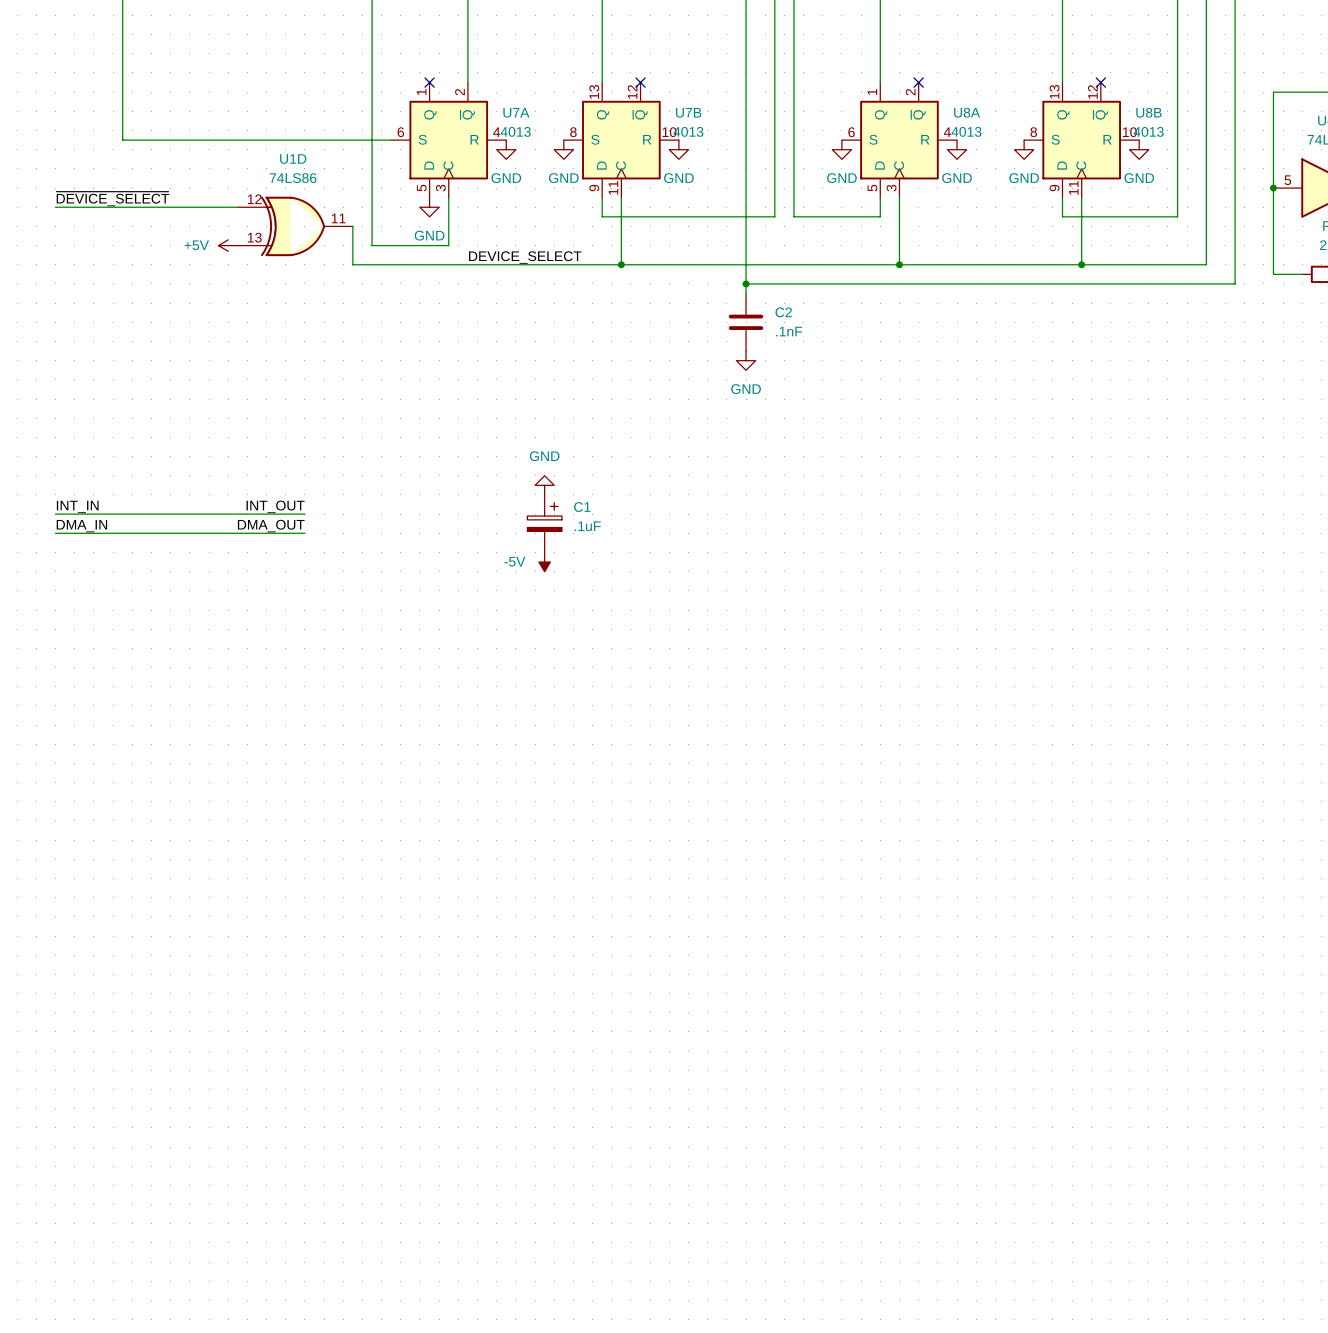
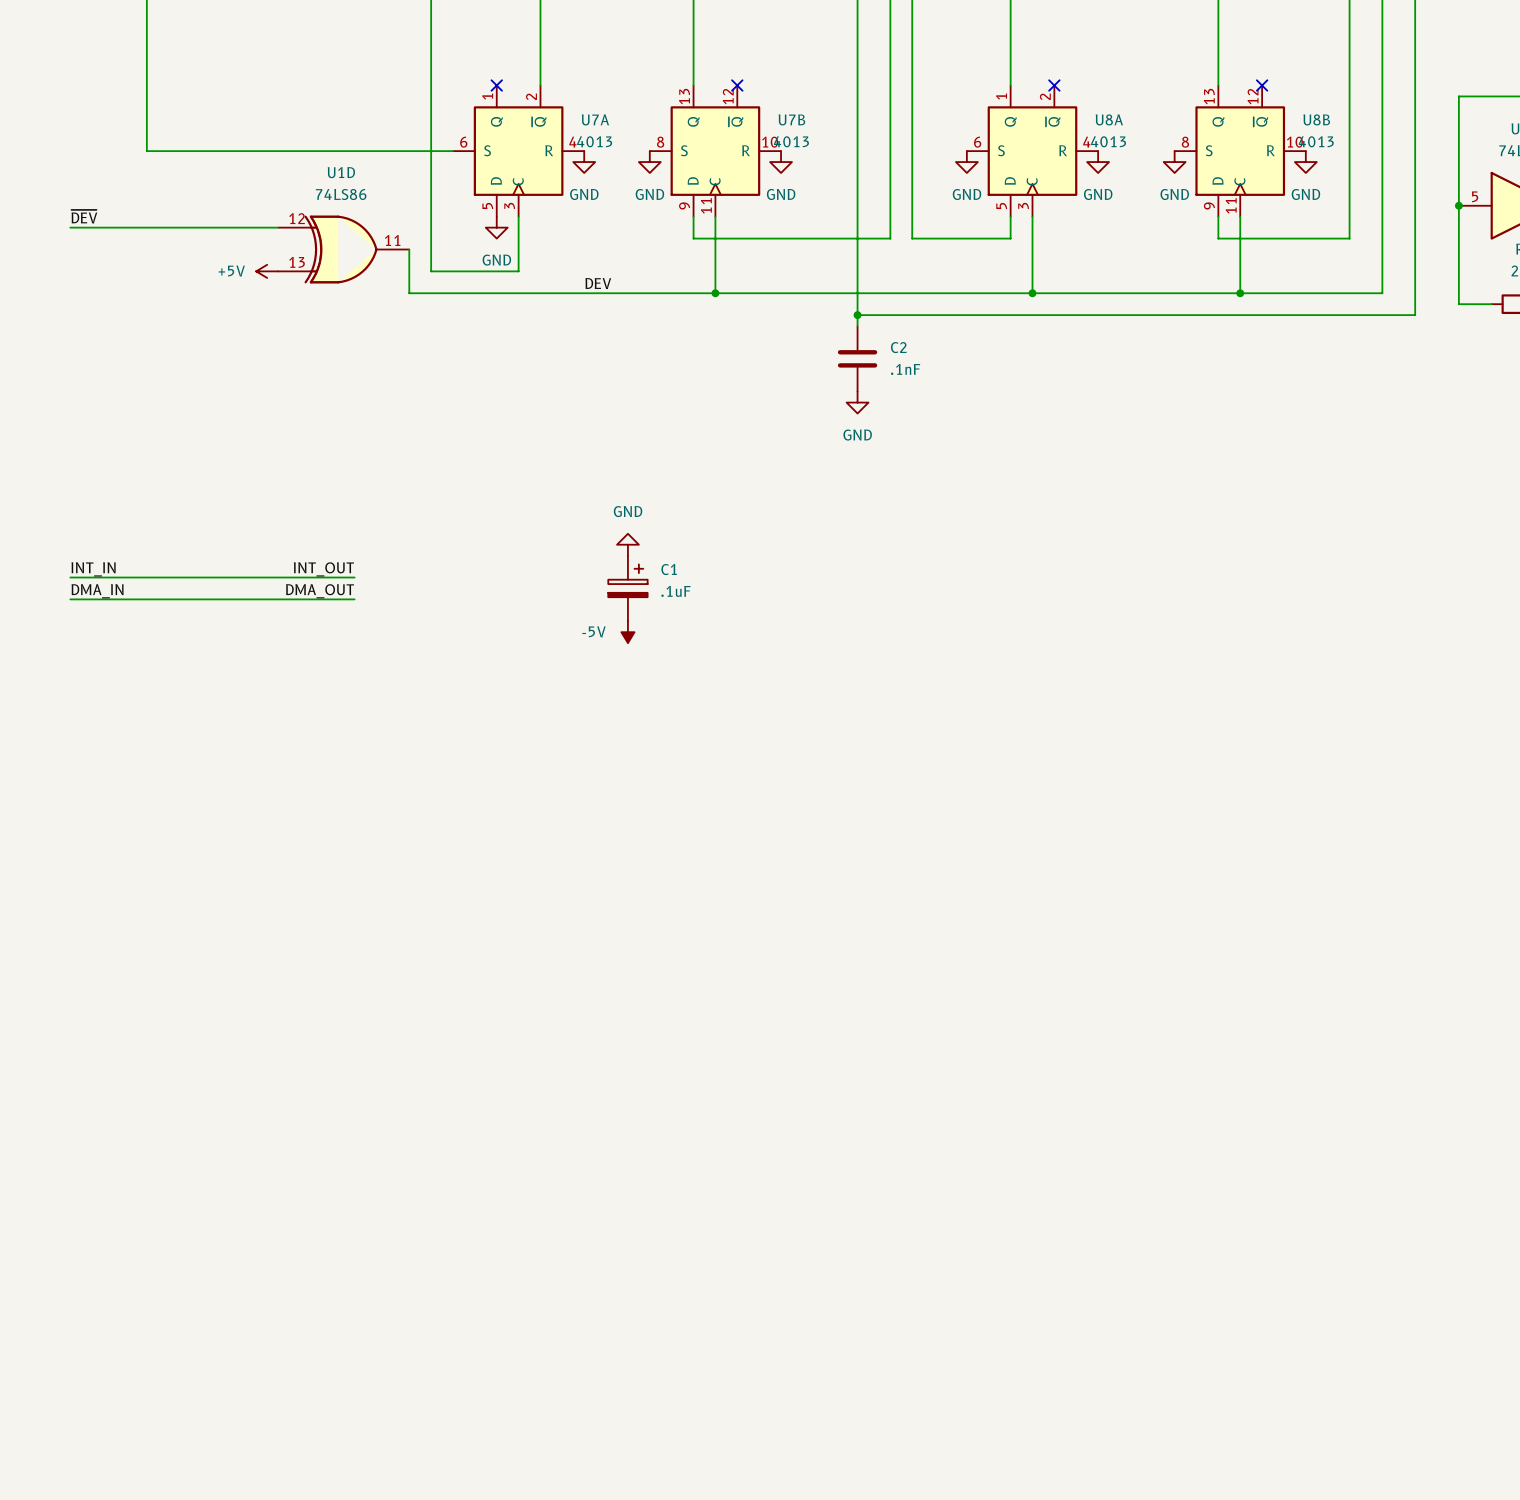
label: ~{DEVICE_SELECT} (112, 198) -> ~{DEV} (84, 216)
label: none -> DEV (598, 283)
label: DEVICE_SELECT (525, 257) -> none

